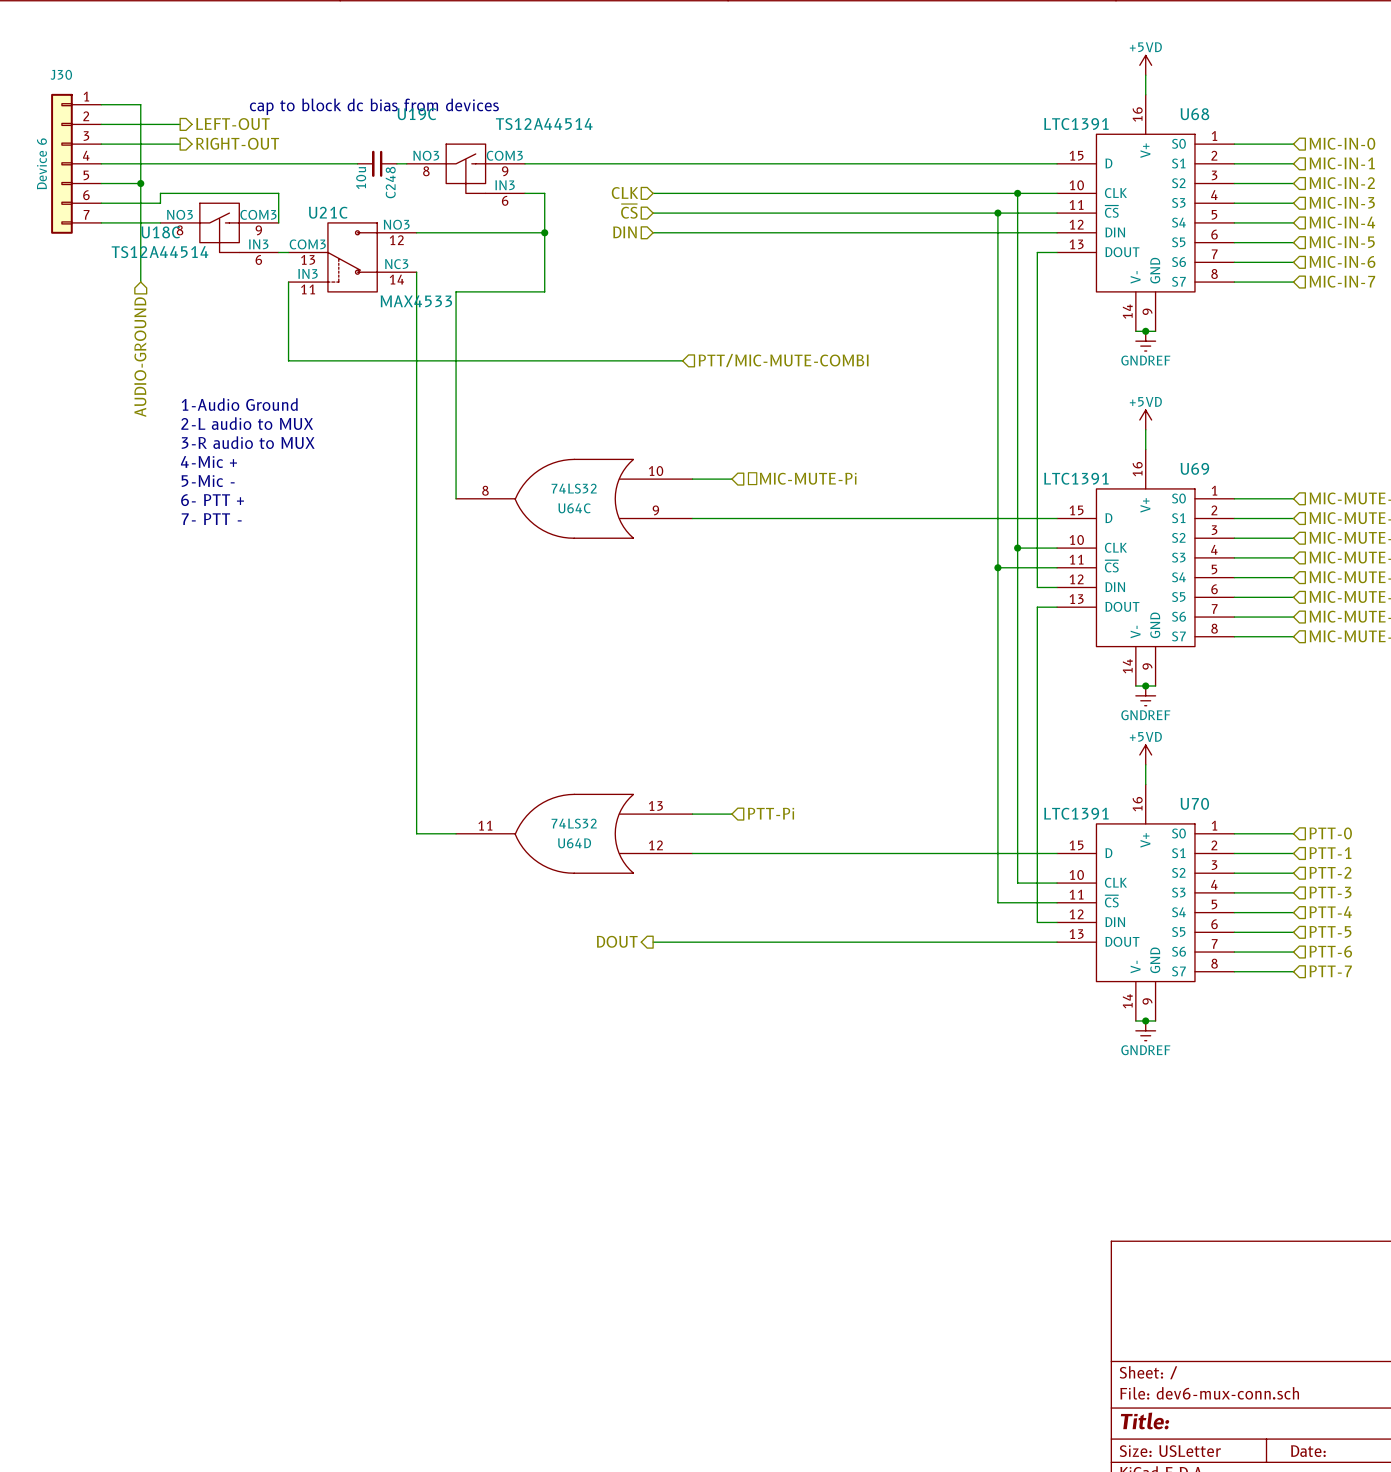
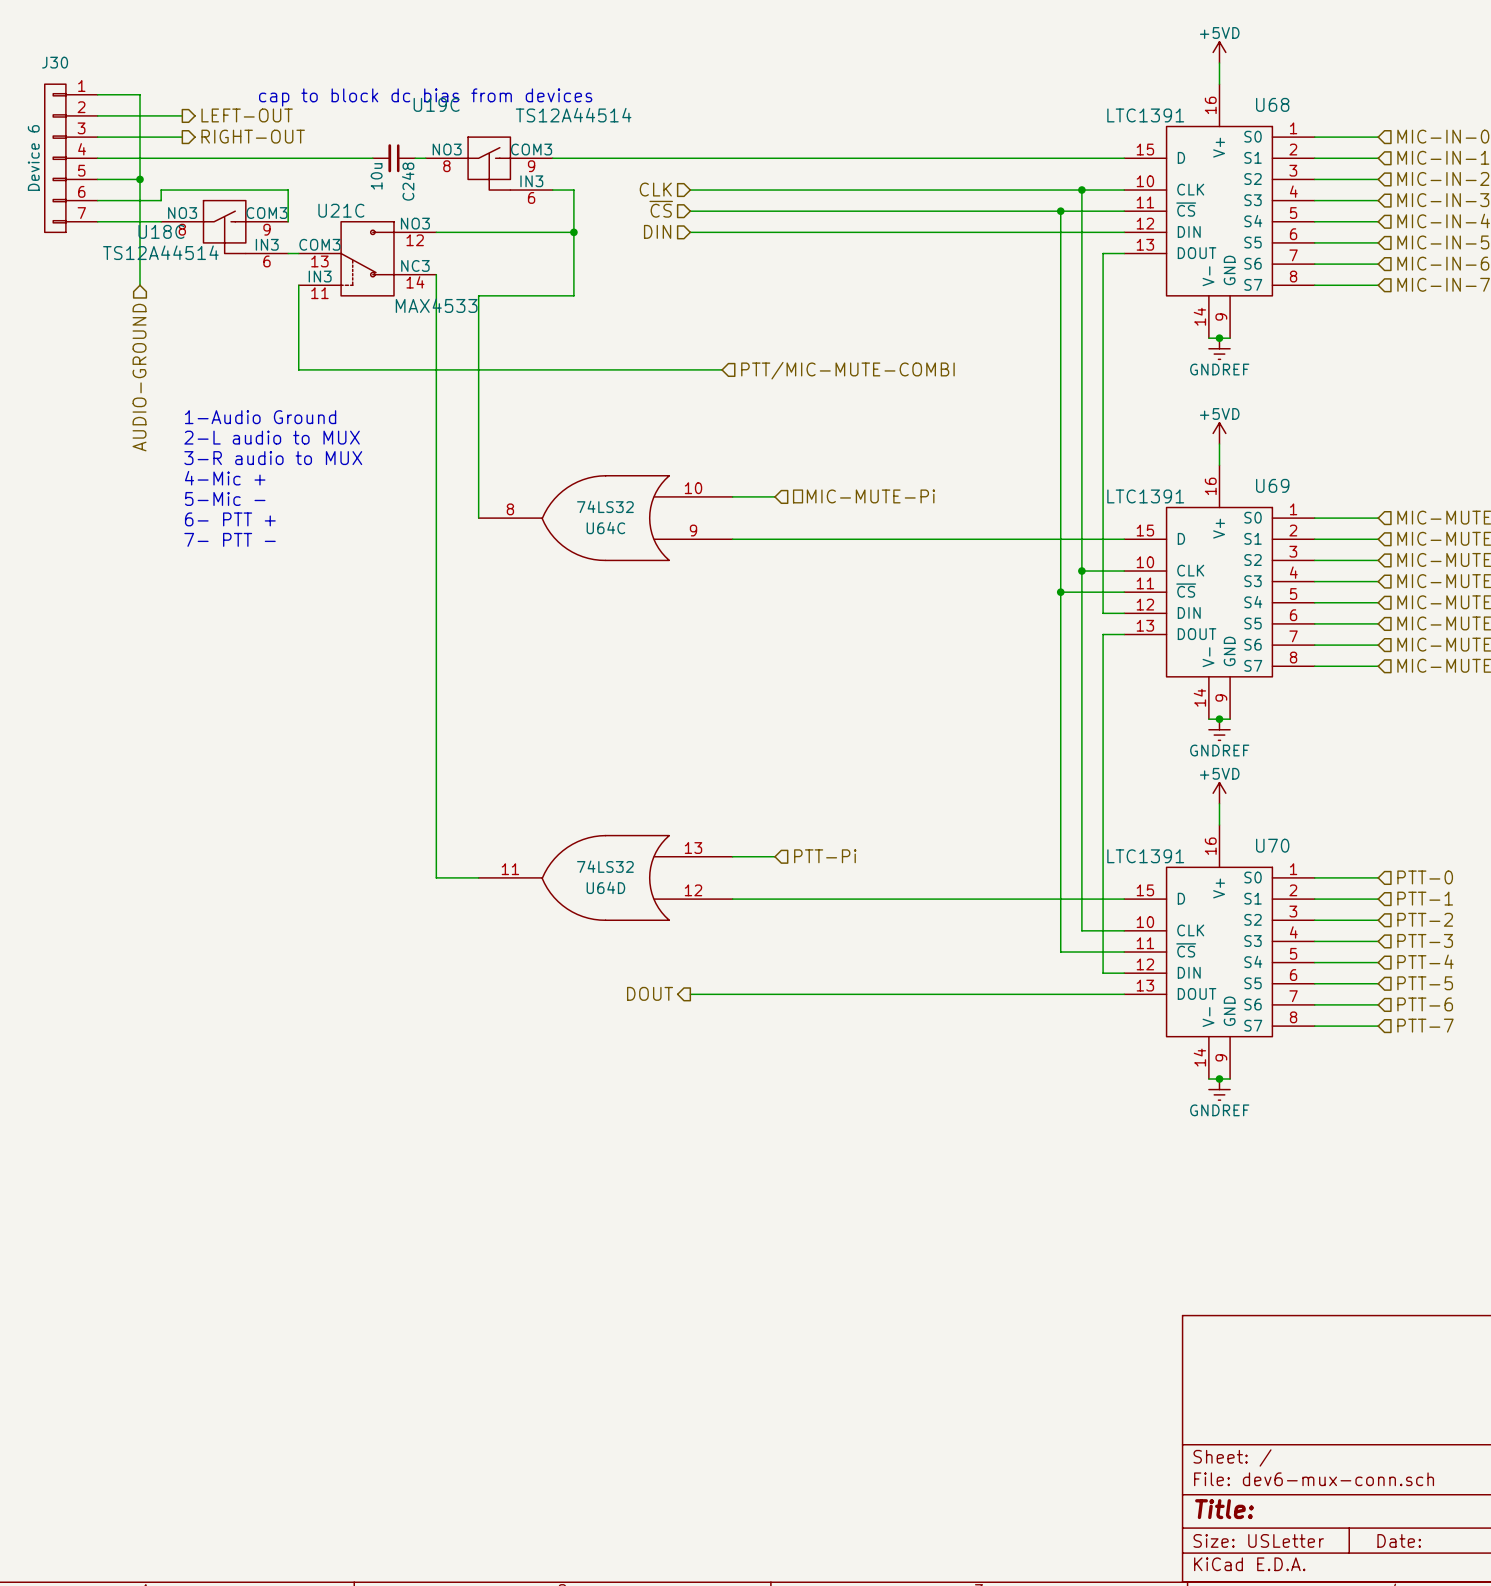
J30 symbol: [51, 93, 102, 234] -> [44, 84, 98, 233]

